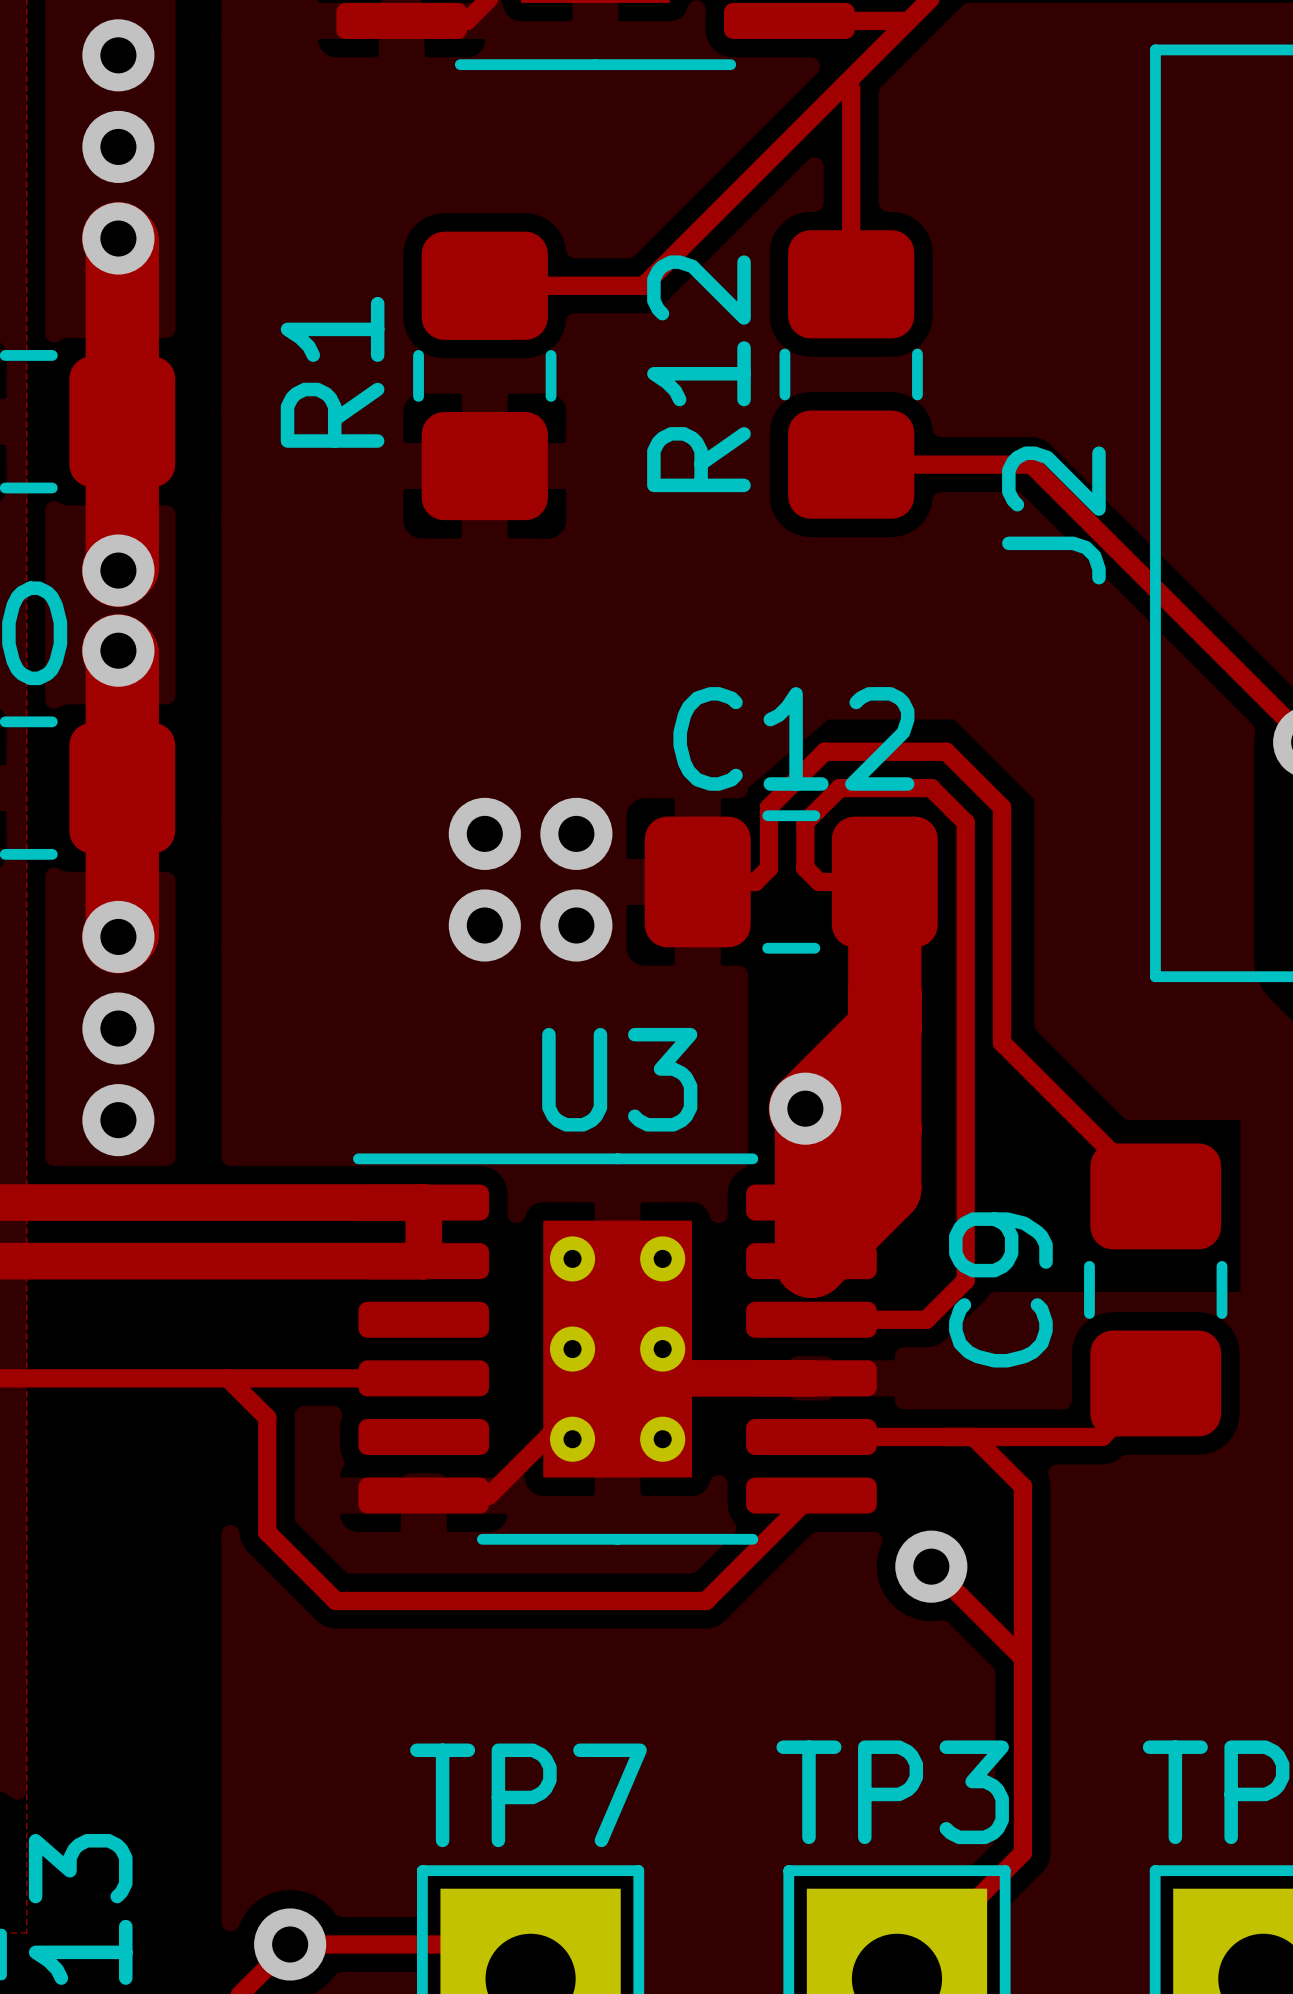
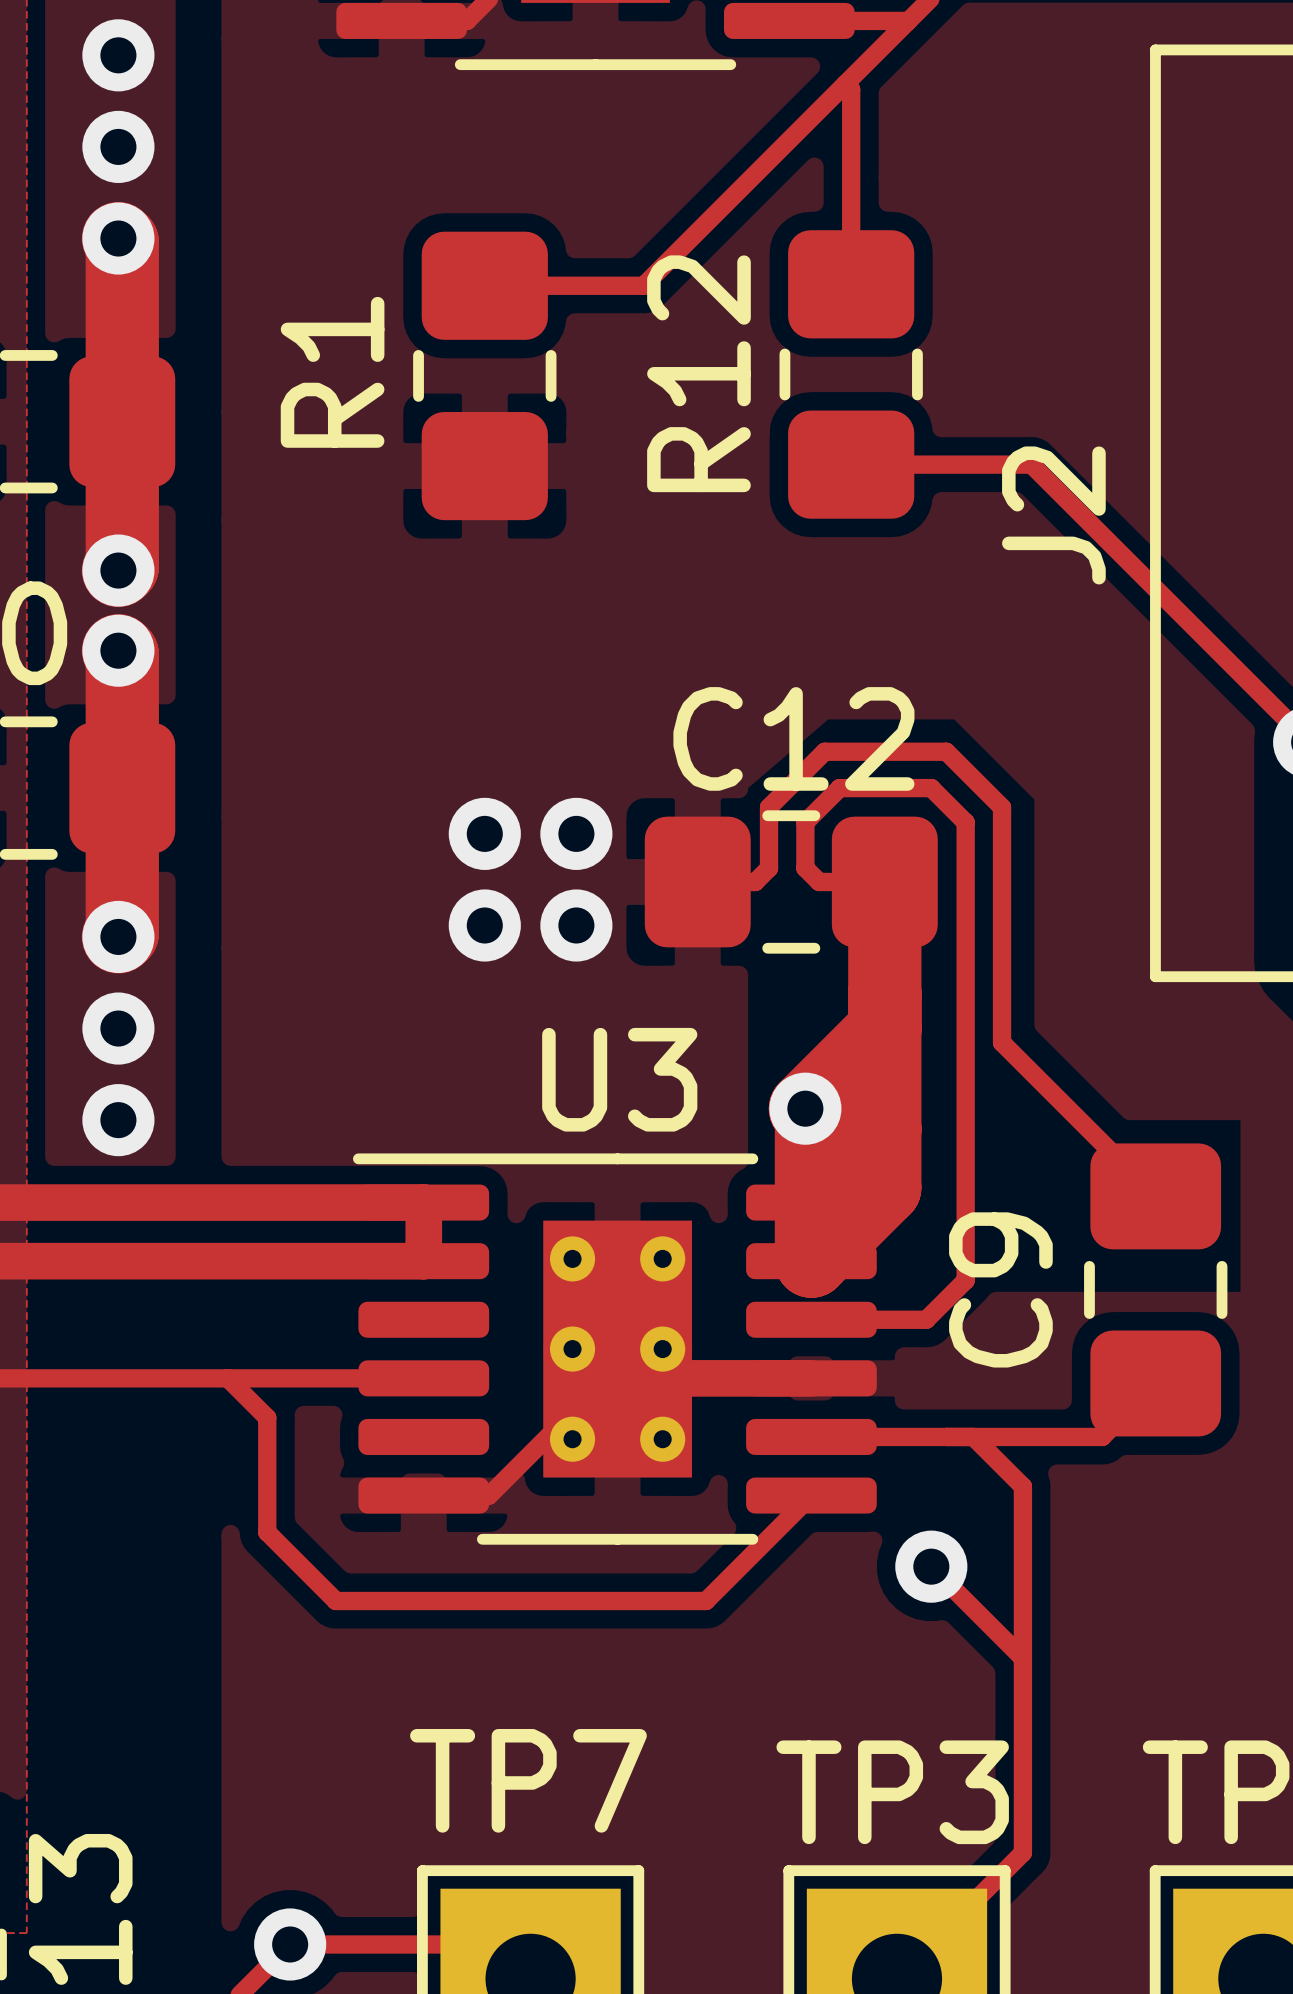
TP7 name position: TP7 (528, 1795) -> TP7 (528, 1780)

